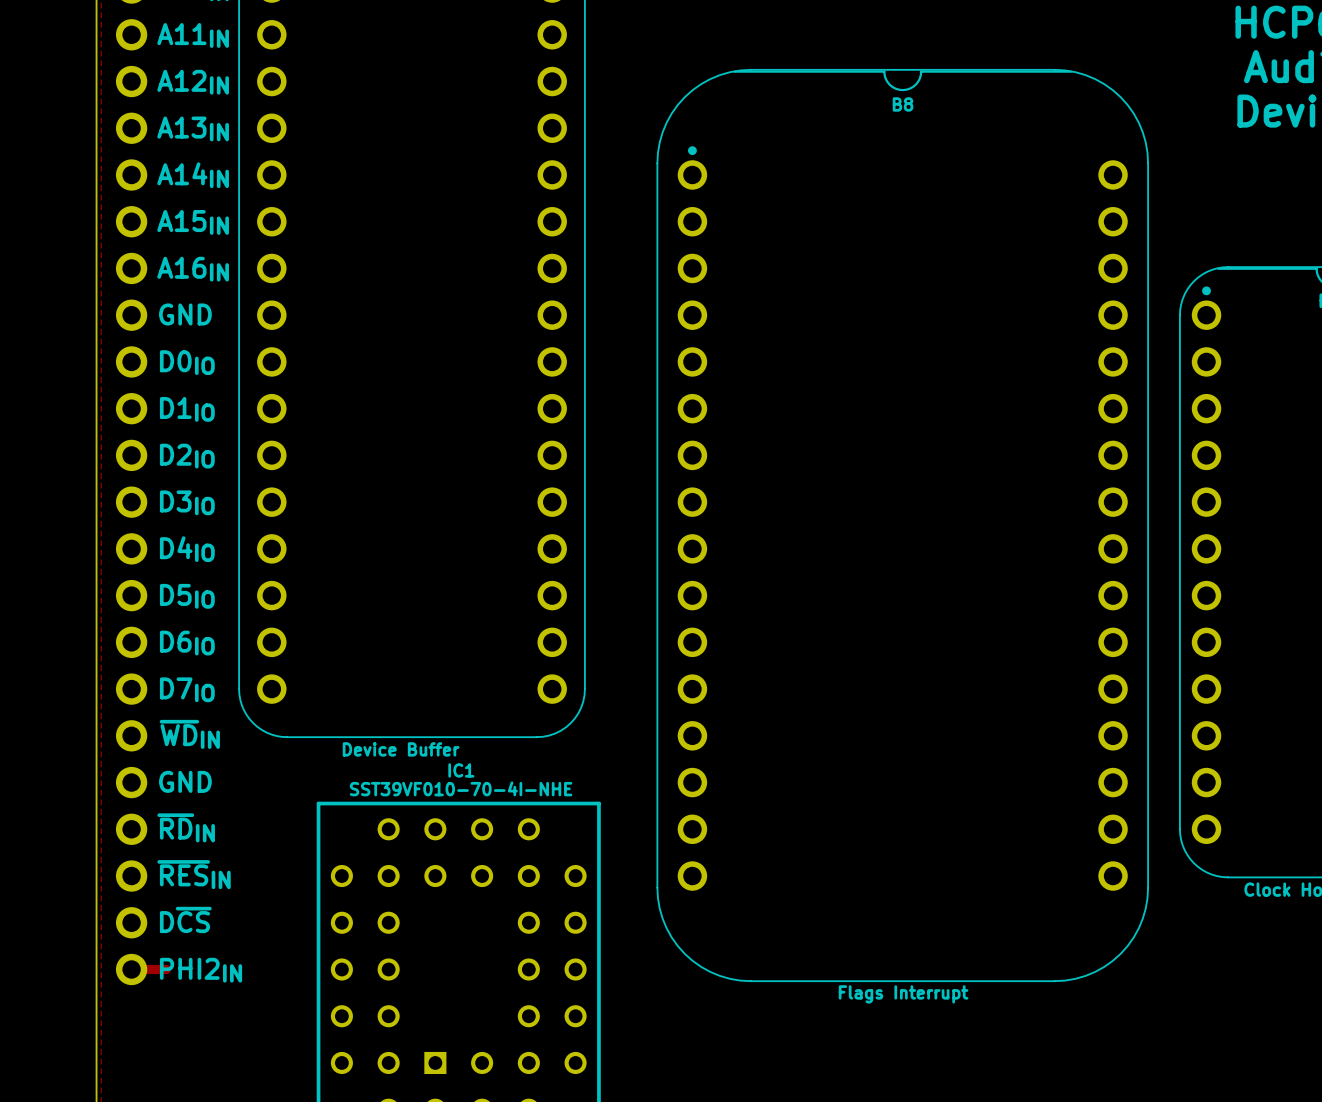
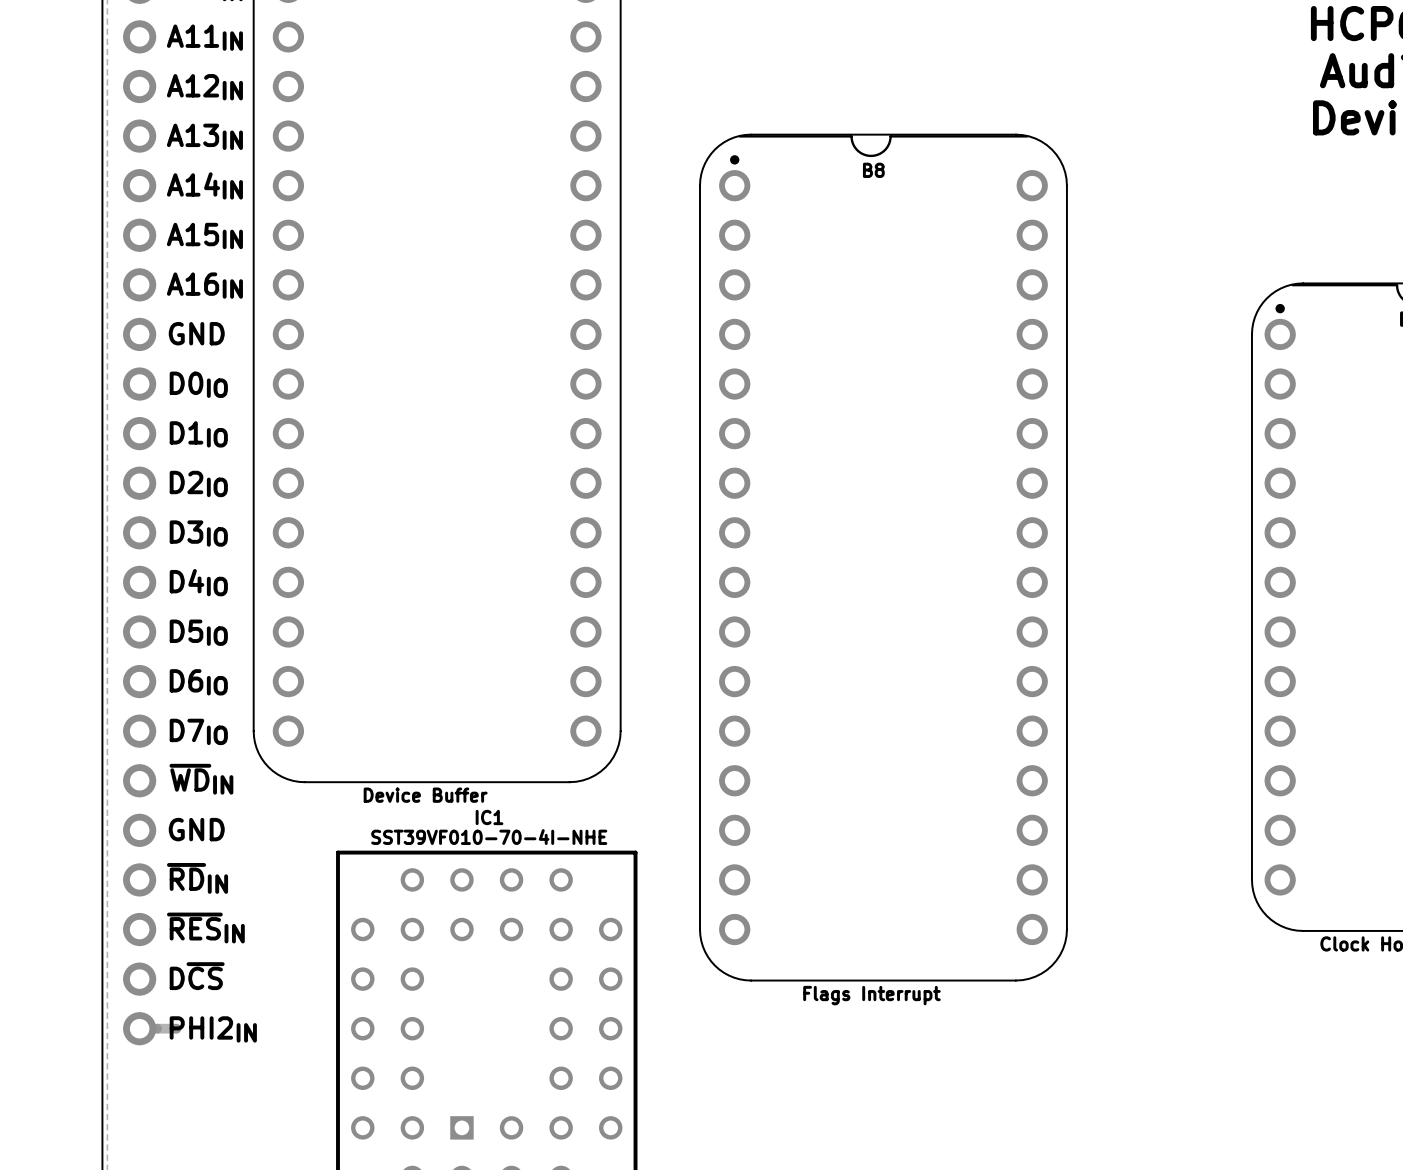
B8 footprint: [656, 68, 1150, 983] -> [699, 133, 1068, 982]
B8 name position: B8 (903, 104) -> B8 (873, 170)

